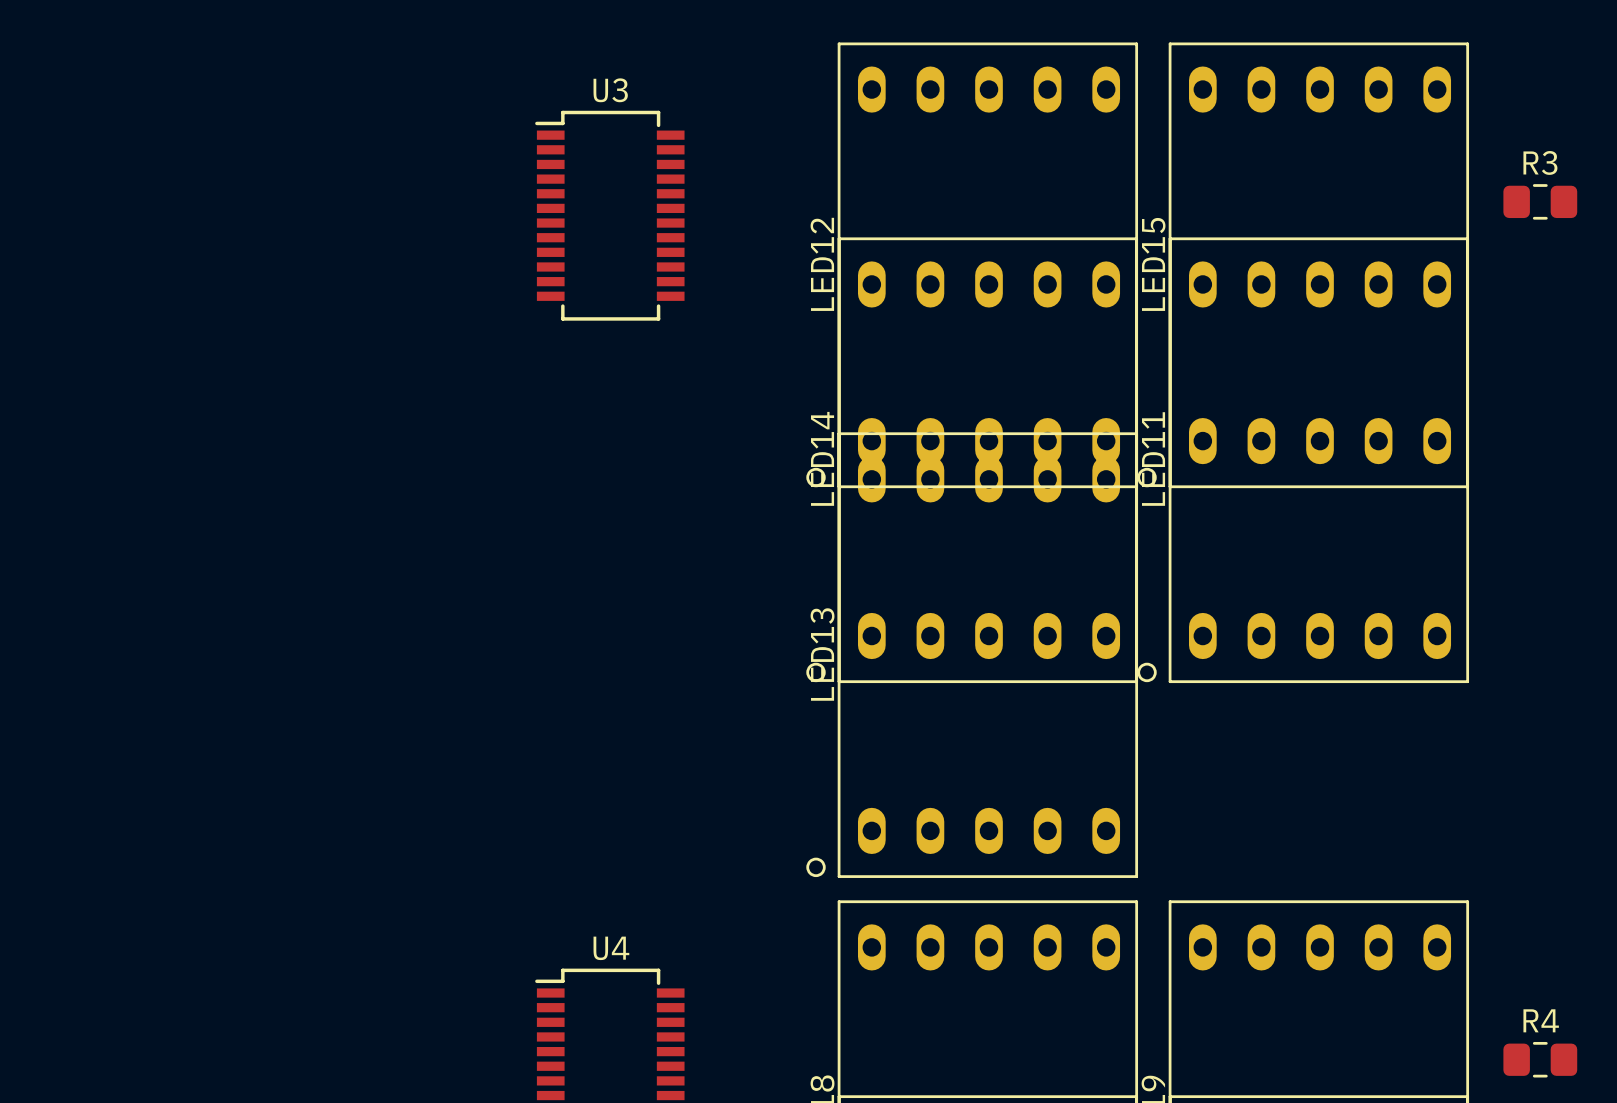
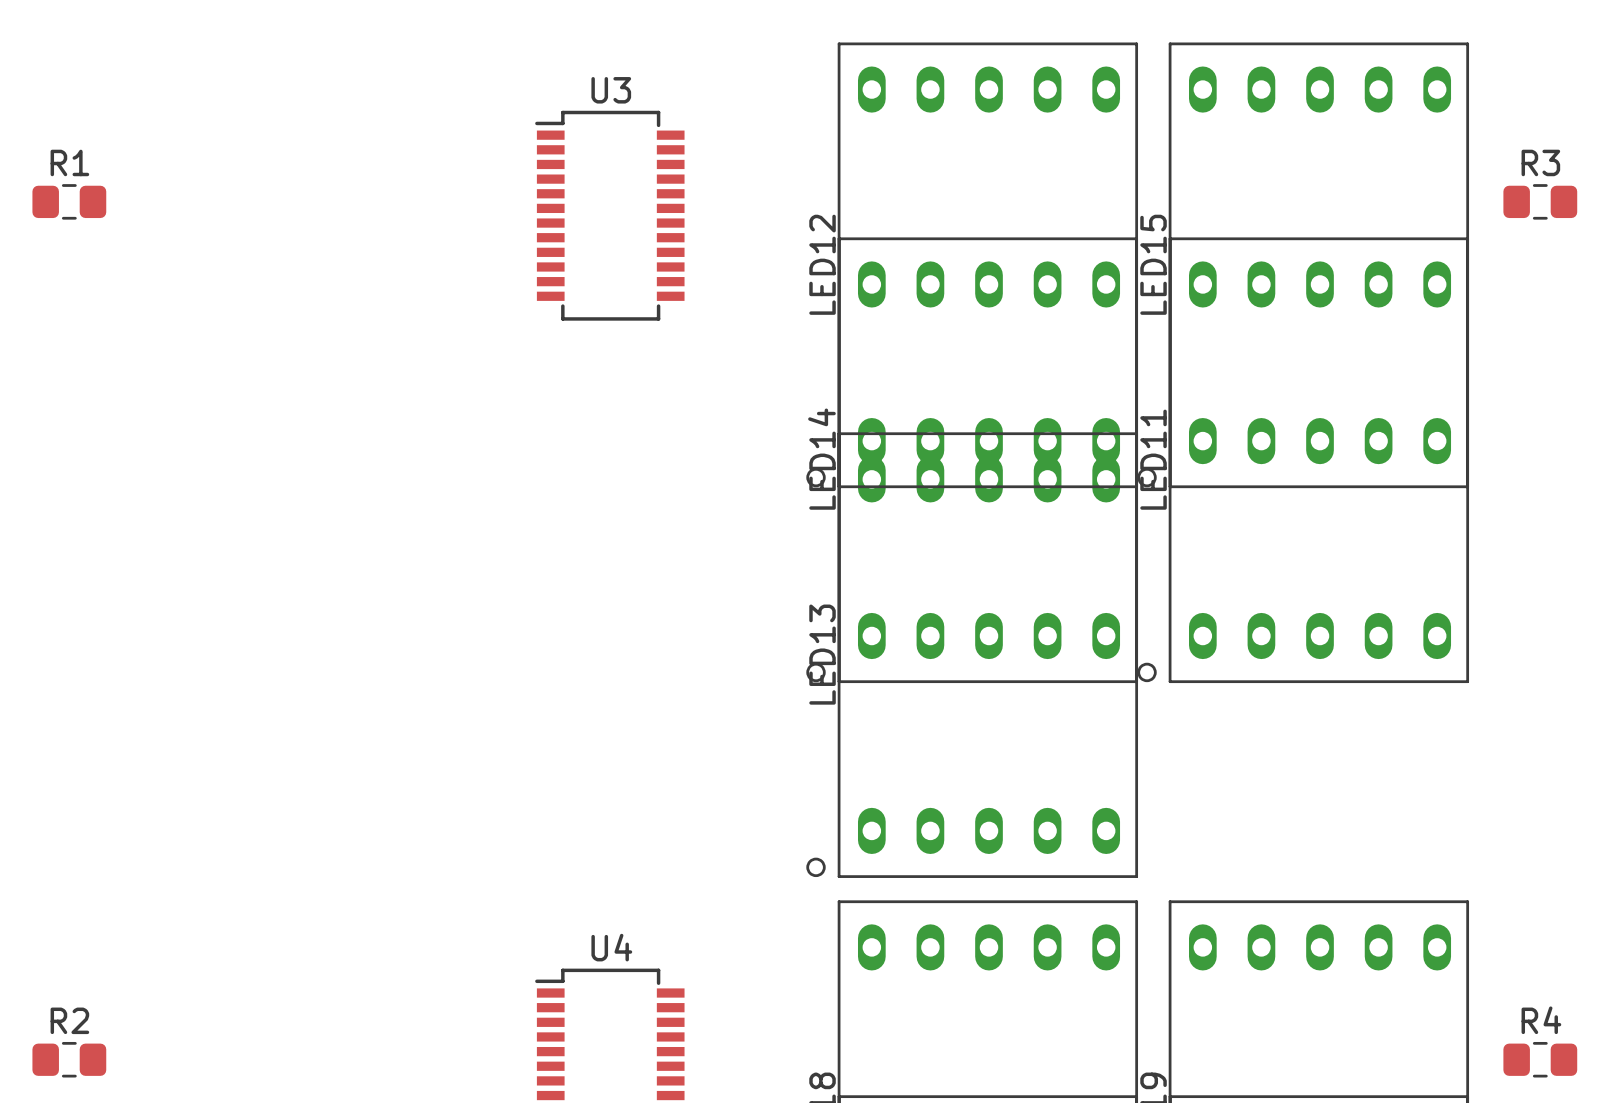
R1: none -> (69, 201)
R2: none -> (69, 1059)

